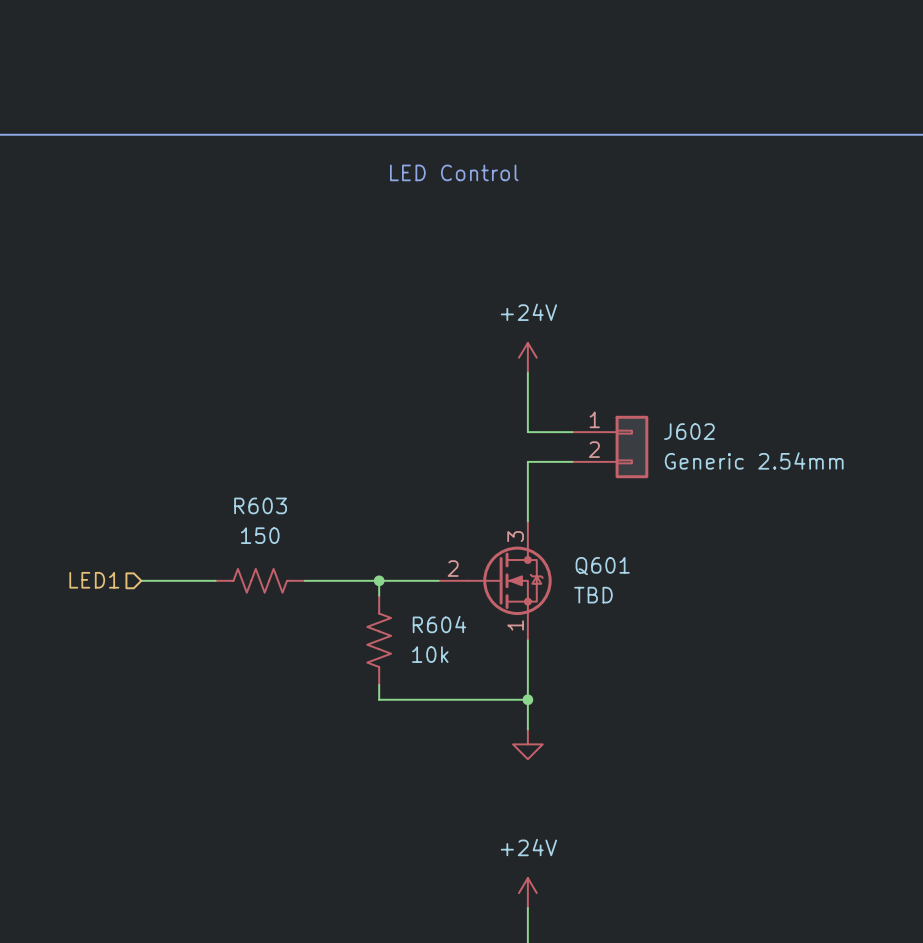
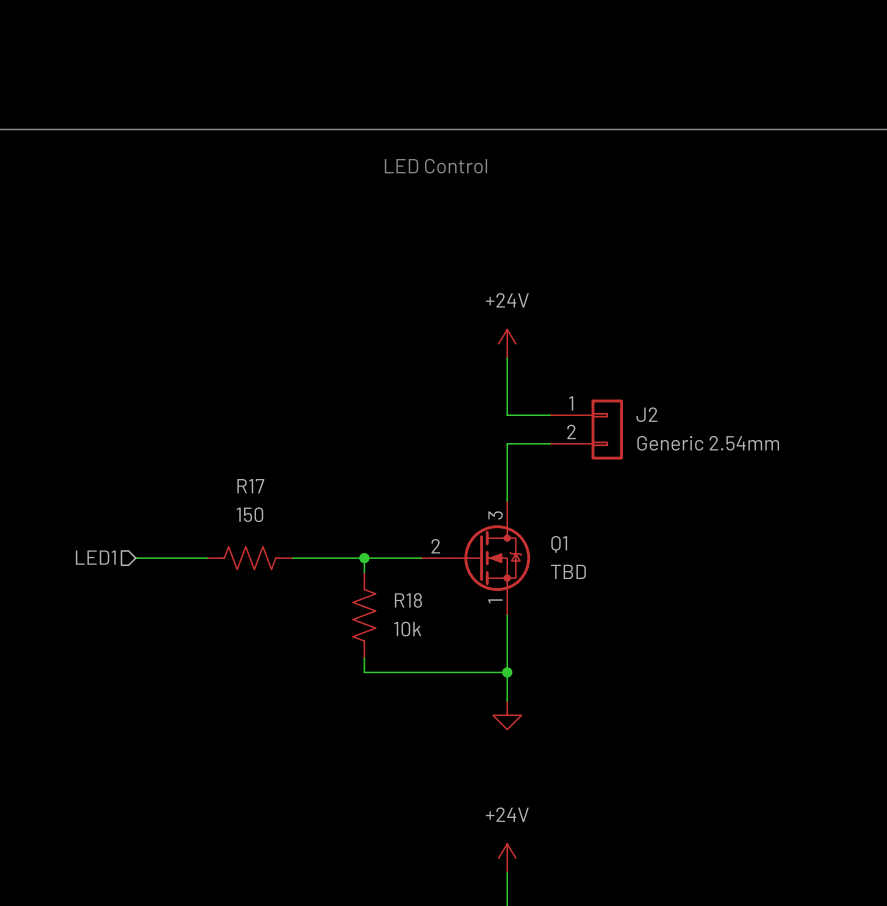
J602 name: J602 (689, 431) -> J2 (646, 414)
R603 name: R603 (260, 505) -> R17 (250, 486)
Q601 name: Q601 (602, 566) -> Q1 (559, 544)
R604 name: R604 (439, 624) -> R18 (408, 600)

